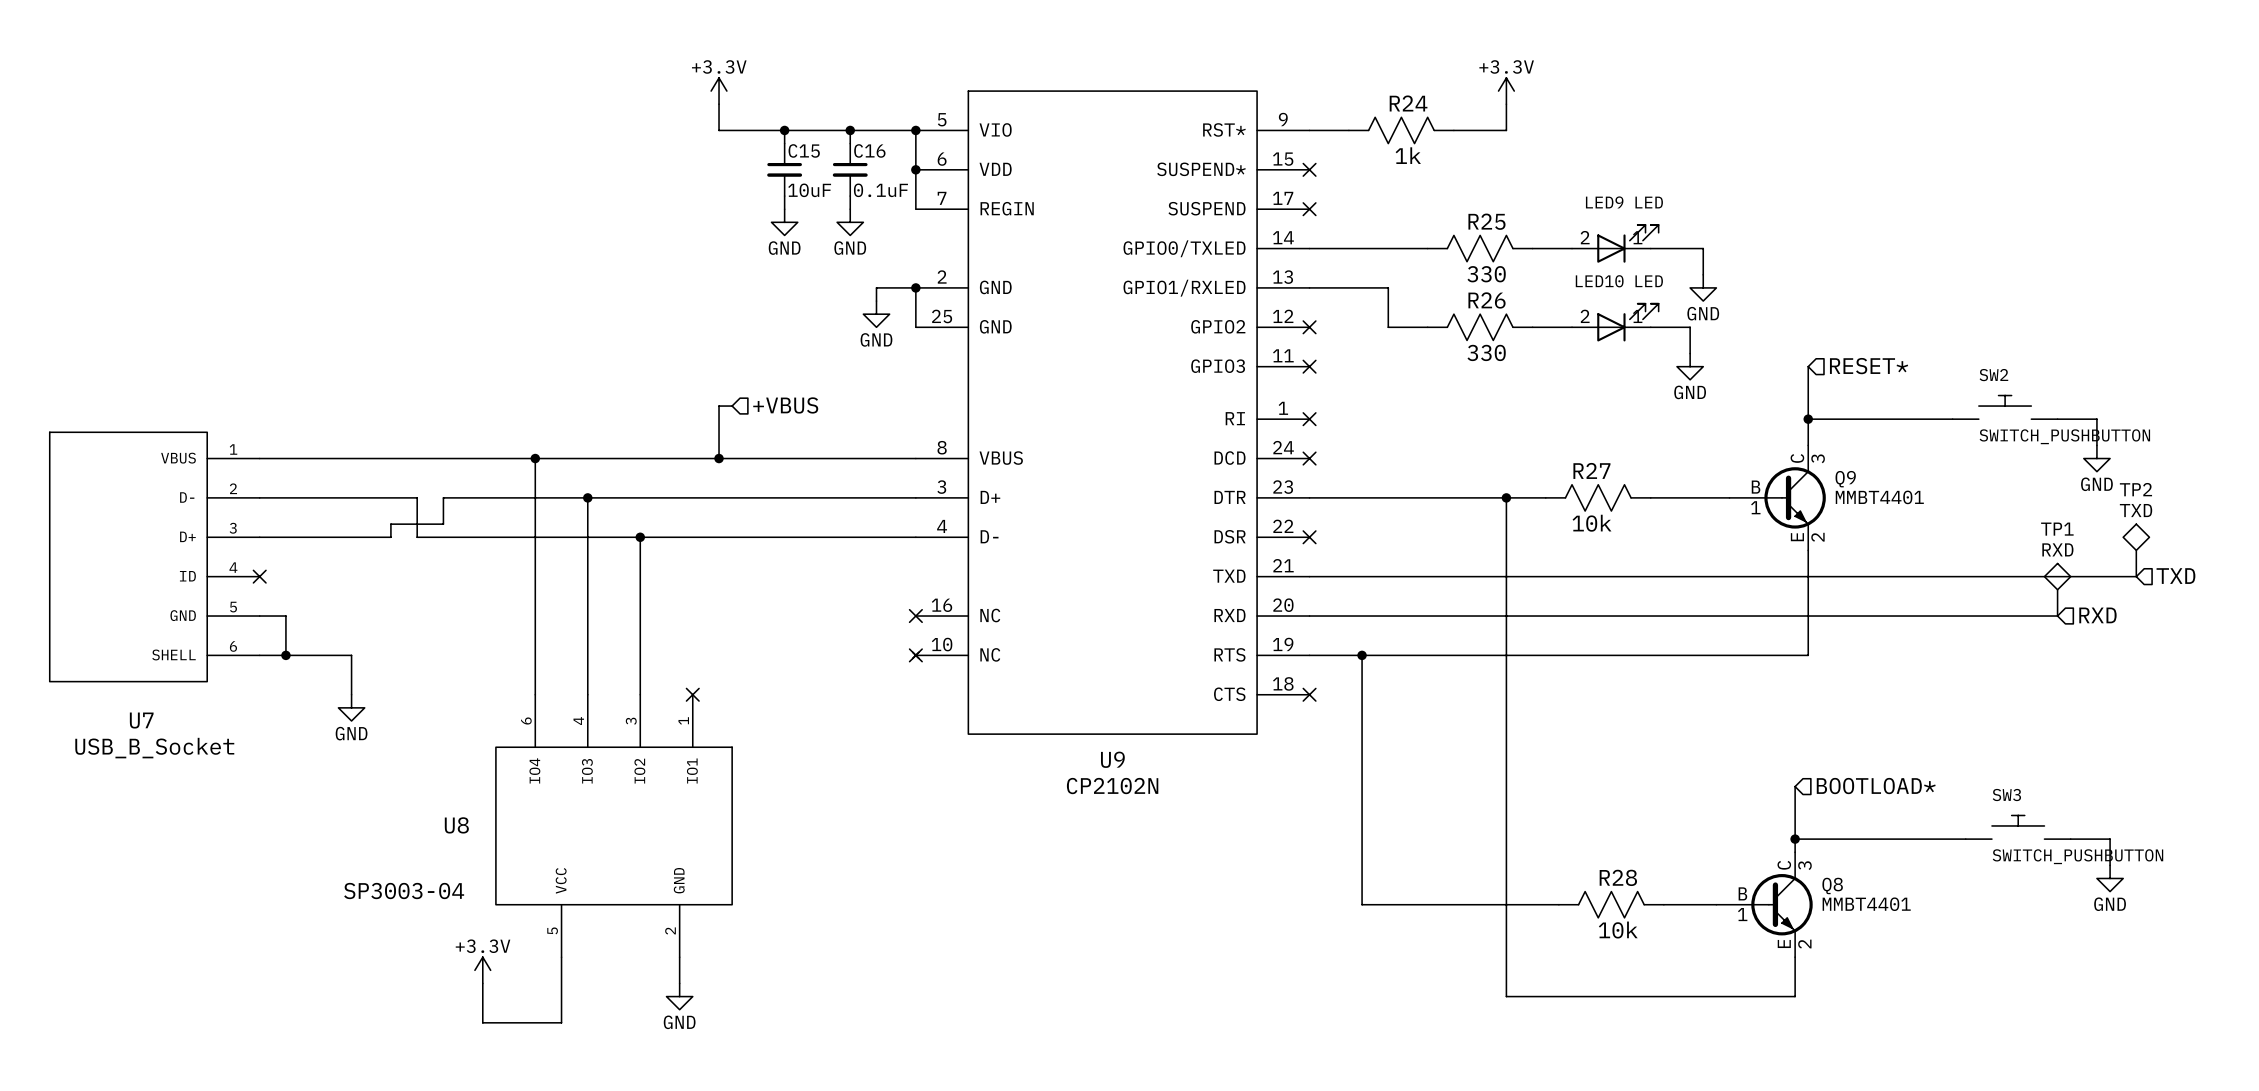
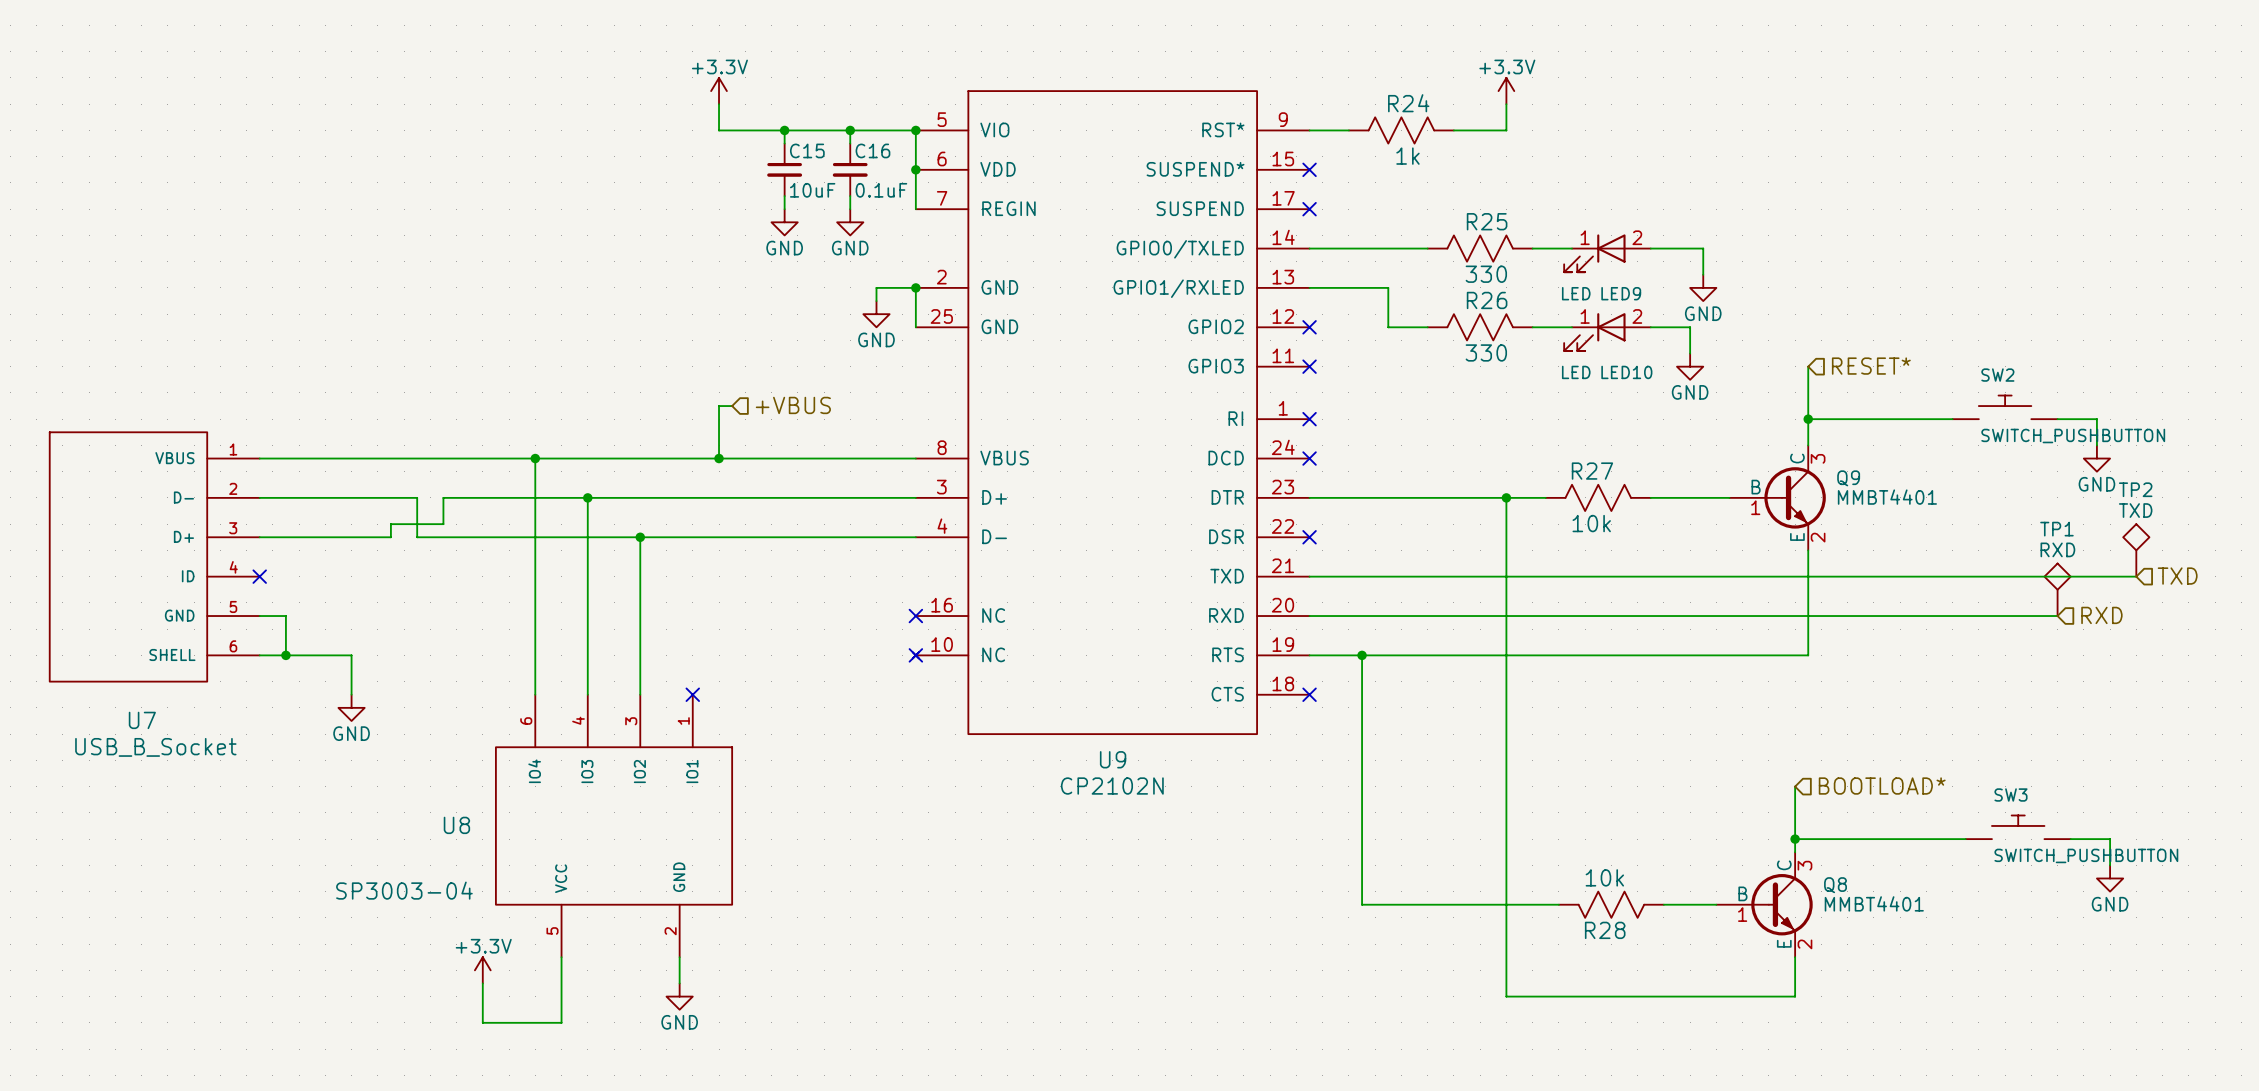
LED9 rotation: 0° (1627, 243) -> 180° (1594, 253)
LED10 rotation: 0° (1627, 322) -> 180° (1594, 332)
R28 rotation: 0° (1611, 904) -> 180° (1611, 904)

